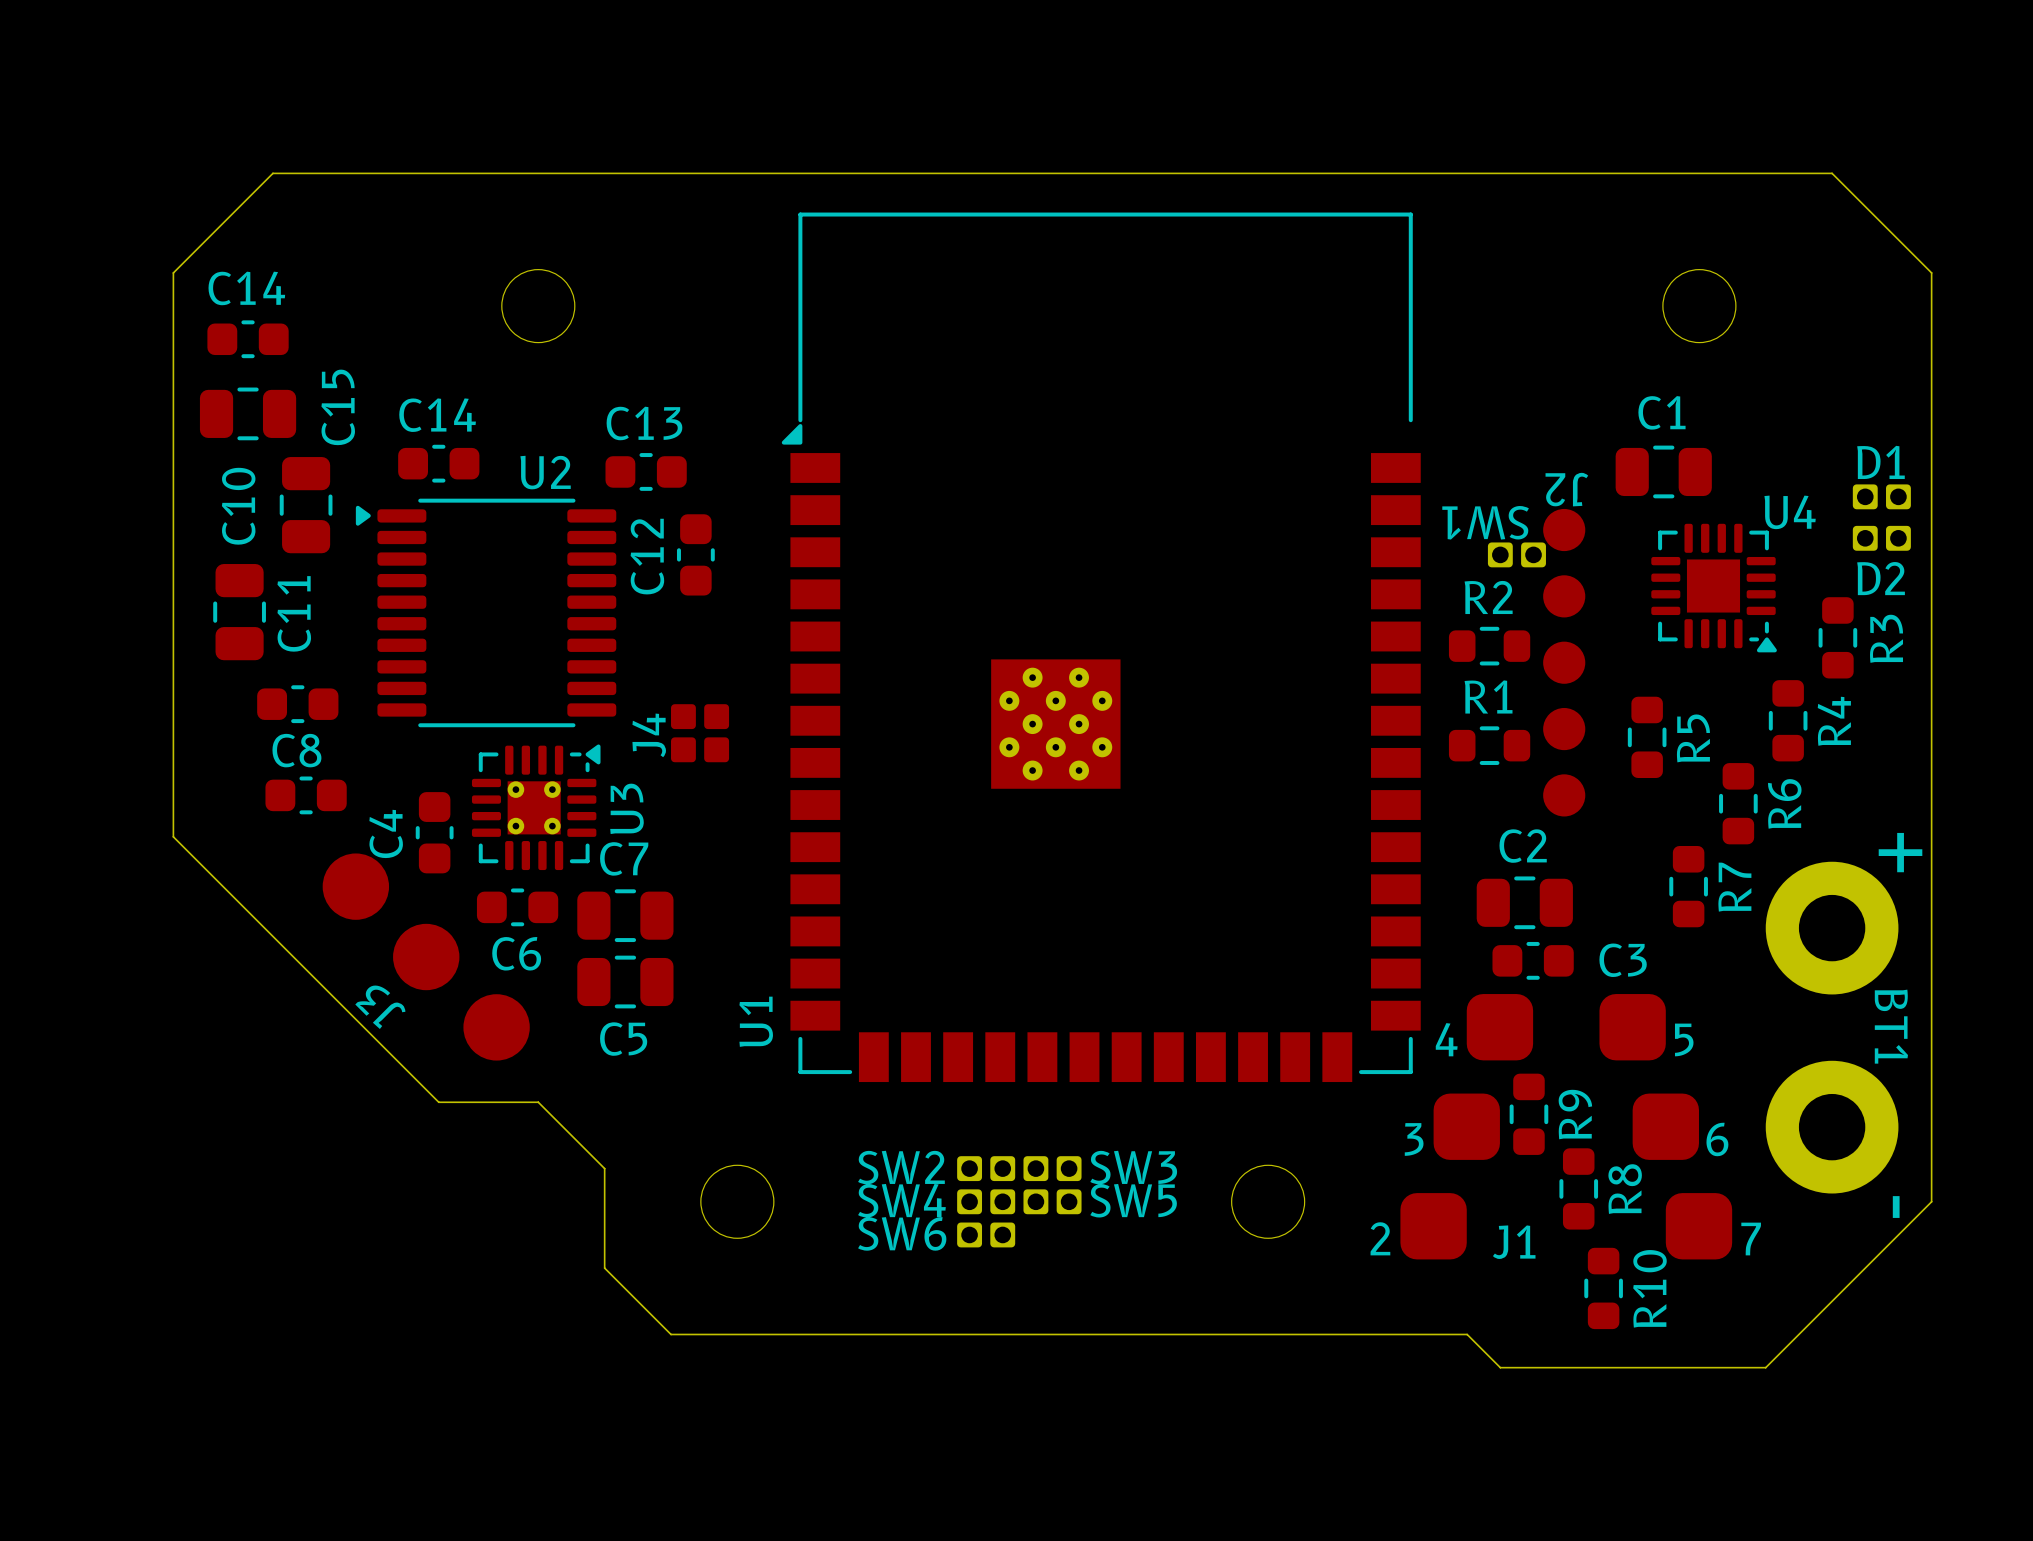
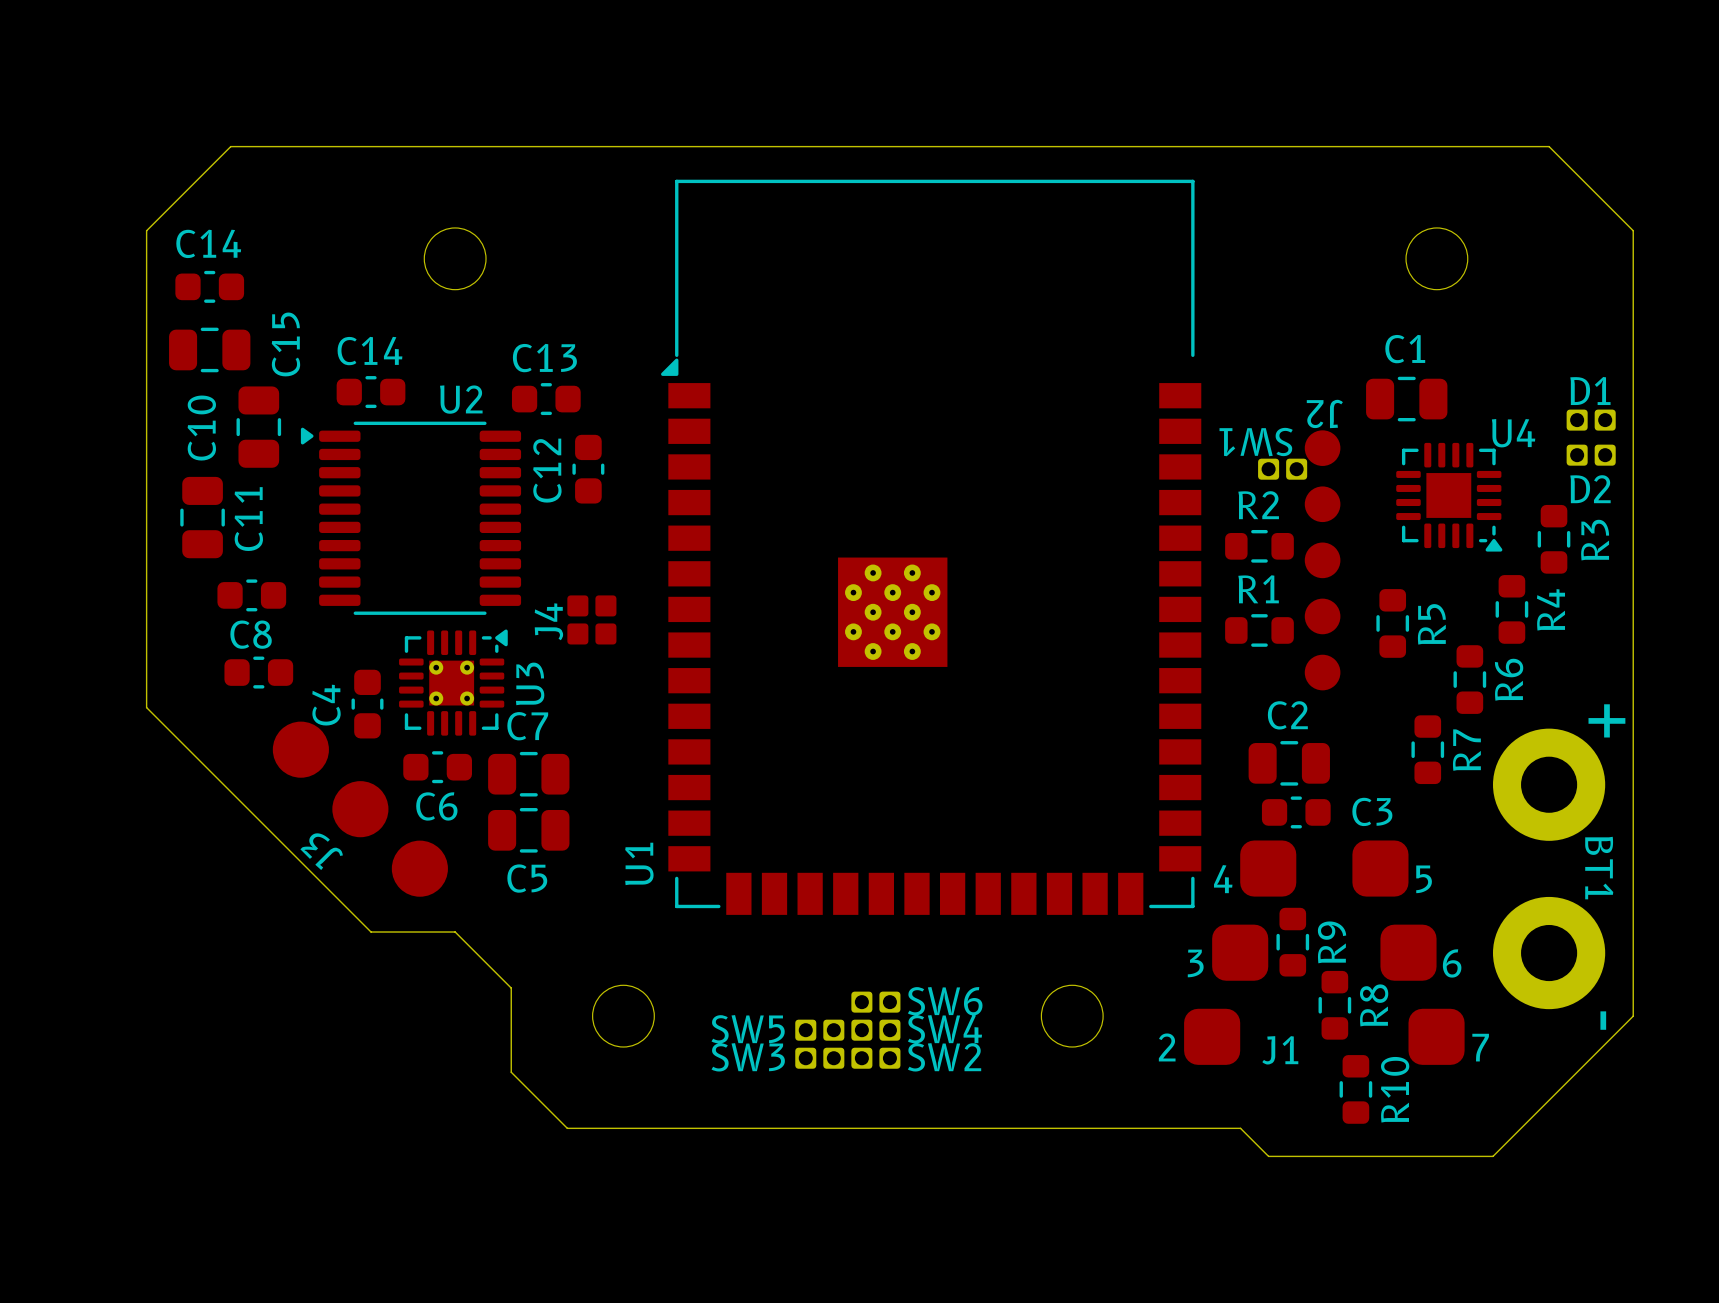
SW2 name position: SW2 (901, 1167) -> SW2 (944, 1057)
SW3 name position: SW3 (1133, 1167) -> SW3 (748, 1057)
SW2 position: (986, 1168) -> (875, 1058)
SW3 position: (1052, 1168) -> (819, 1058)
SW4 name position: SW4 (901, 1200) -> SW4 (944, 1029)
SW5 name position: SW5 (1133, 1200) -> SW5 (748, 1029)
SW4 position: (986, 1201) -> (875, 1030)
SW5 position: (1052, 1201) -> (819, 1030)
SW6 name position: SW6 (902, 1233) -> SW6 (945, 1001)
SW6 position: (986, 1234) -> (875, 1002)

